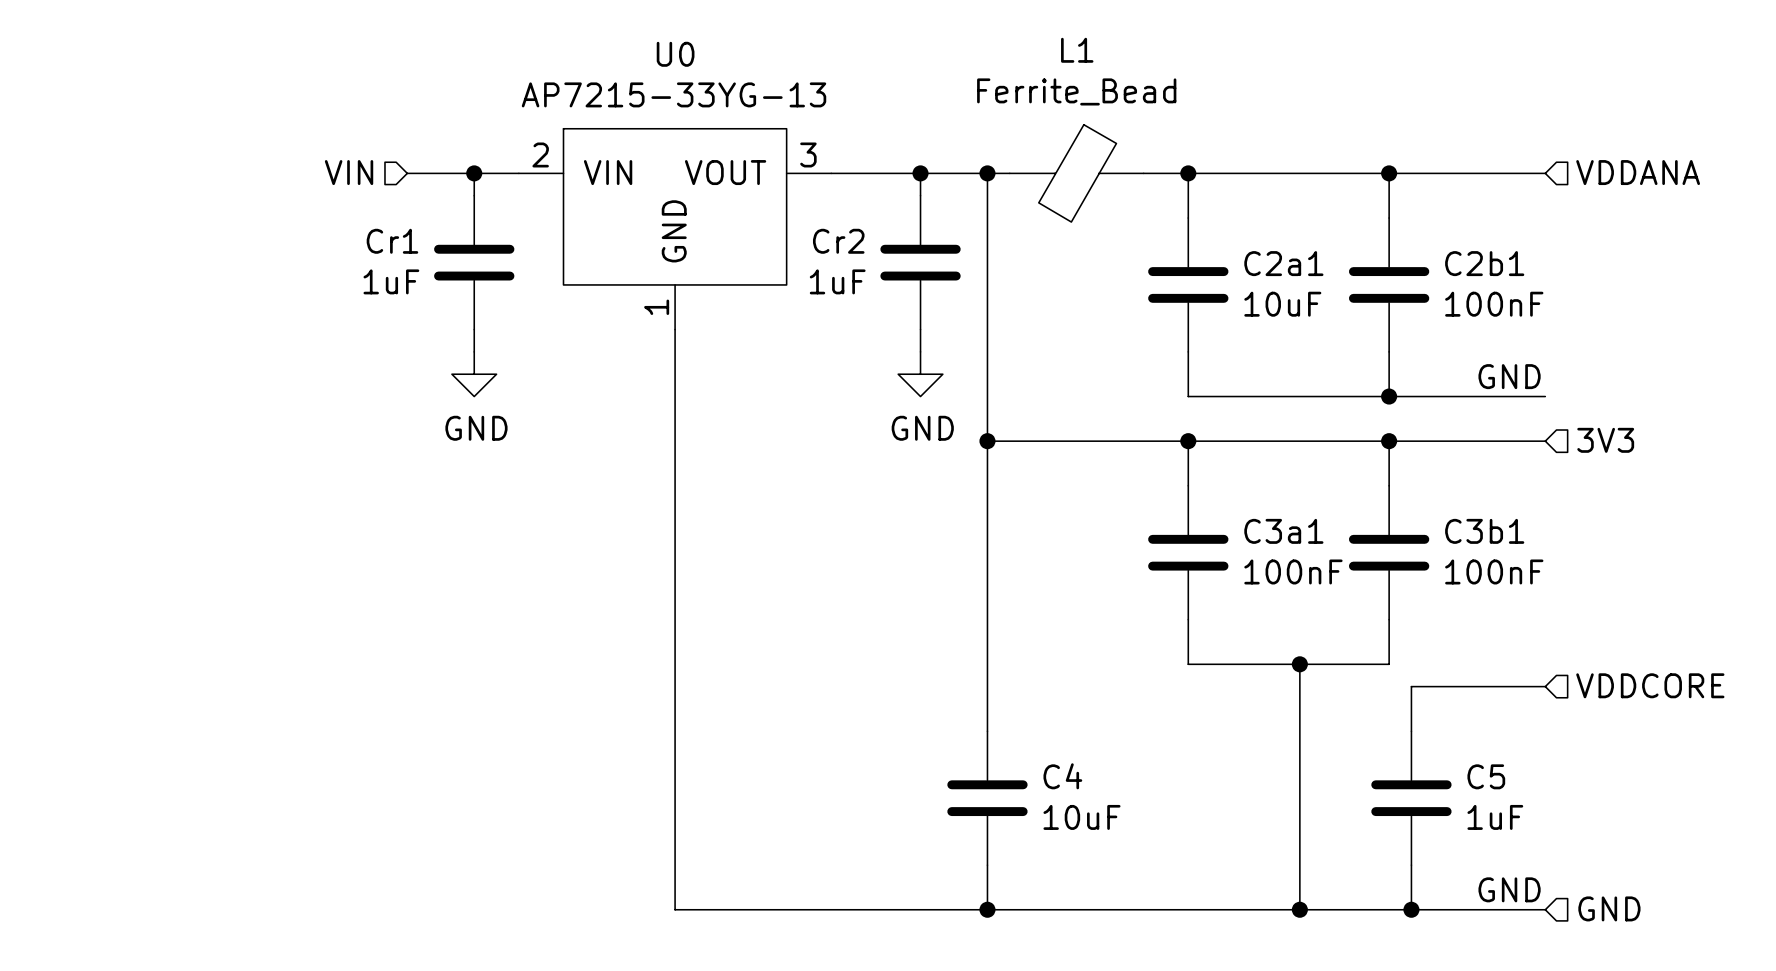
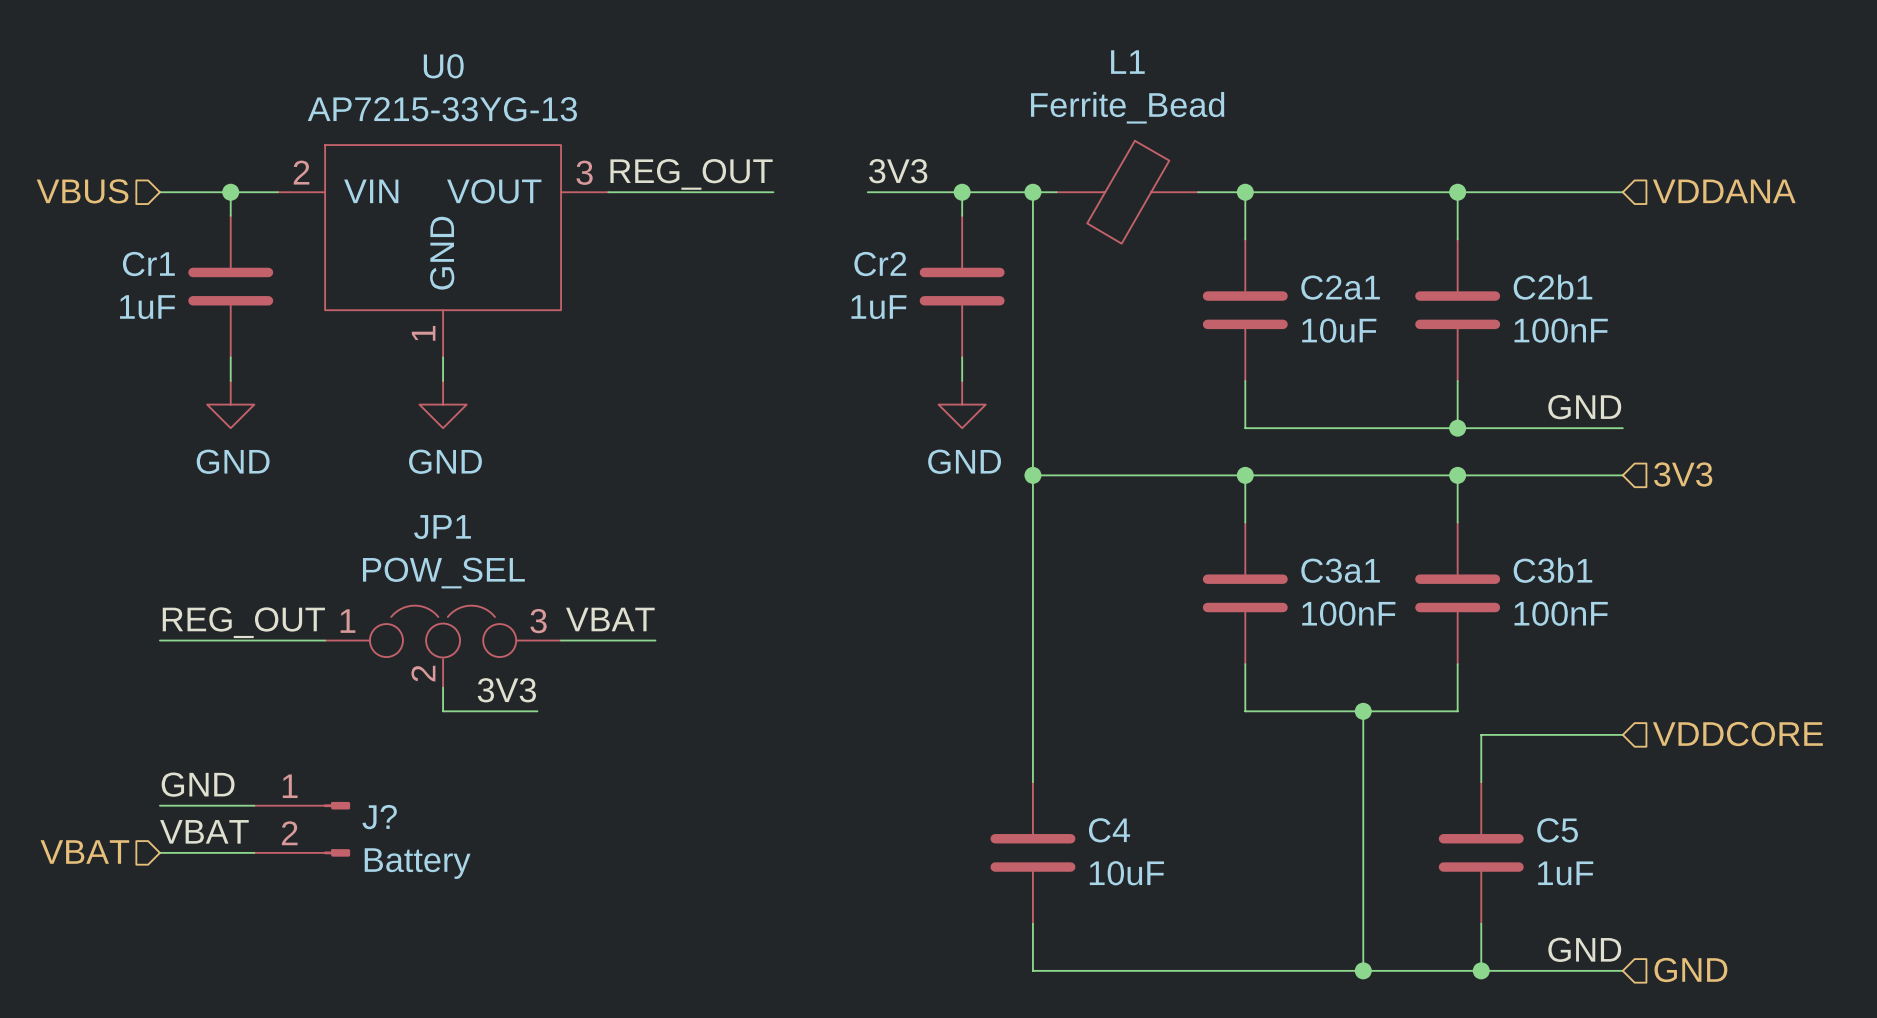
label: none -> 3V3 (898, 171)
label: none -> REG_OUT (691, 174)
hierarchical label: none -> VBUS (82, 191)
hierarchical label: VIN (349, 172) -> none
junction: none -> (230, 192)
wire: (407, 173) (518, 173) -> (159, 192) (277, 192)
wire: (474, 173) (474, 195) -> (230, 192) (230, 215)
junction: (474, 173) -> none
wire: none -> (608, 192) (773, 192)
U0 position: (675, 229) -> (443, 251)
Cr1 position: (474, 262) -> (230, 286)
wire: none -> (443, 357) (443, 380)
wire: (474, 329) (474, 351) -> (230, 357) (230, 380)
wire: (675, 329) (675, 909) (987, 909) -> none
power symbol: none -> GND (230, 404)
power symbol position: GND (474, 374) -> GND (443, 404)
label: none -> VBAT (610, 619)
label: none -> REG_OUT (243, 622)
wire: none -> (159, 640) (325, 640)
wire: none -> (561, 640) (655, 640)
JP1: none -> POW_SEL (443, 646)
wire: none -> (443, 687) (443, 711) (537, 711)
label: none -> 3V3 (506, 690)
label: none -> GND (198, 784)
wire: none -> (159, 805) (254, 805)
J?: none -> Battery (302, 829)
label: none -> VBAT (204, 831)
hierarchical label: none -> VBAT (84, 852)
wire: none -> (159, 852) (254, 852)
junction: (987, 909) -> none

